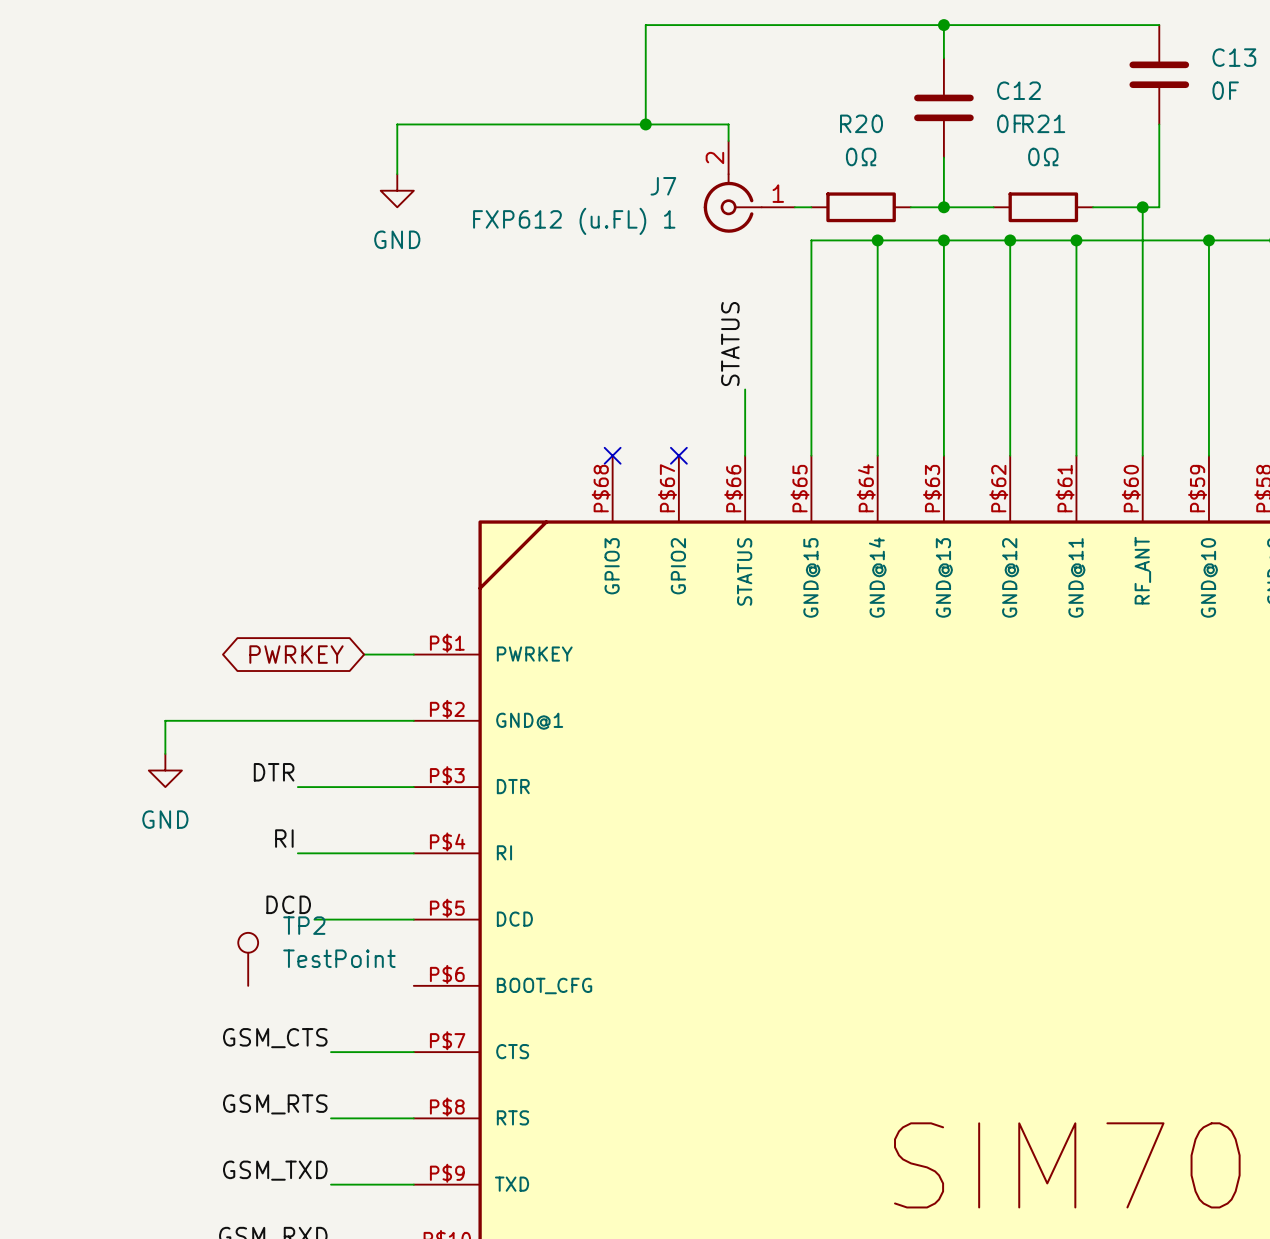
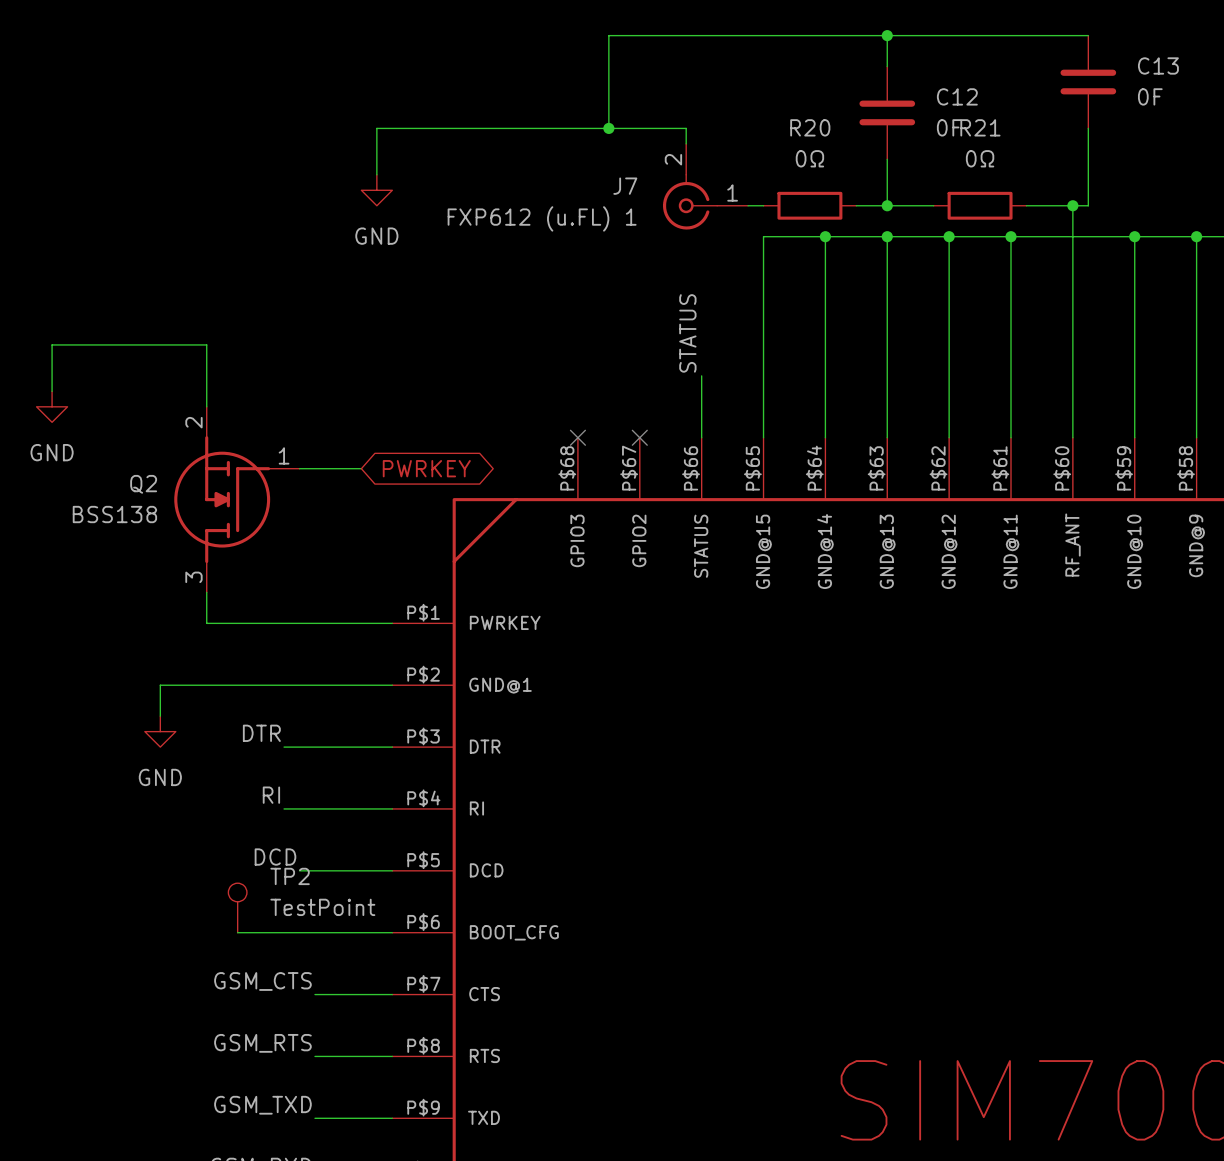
wire: none -> (52, 391) (52, 344) (206, 344) (206, 406)
power symbol: none -> GND (52, 406)
wire: none -> (299, 468) (361, 468)
Q2: none -> BSS138 (236, 499)
wire: none -> (206, 592) (206, 623) (345, 623)
global label rotation: 0° (296, 654) -> 180° (426, 468)
global label position: PWRKEY (296, 654) -> PWRKEY (426, 468)
wire: none -> (237, 932) (392, 932)

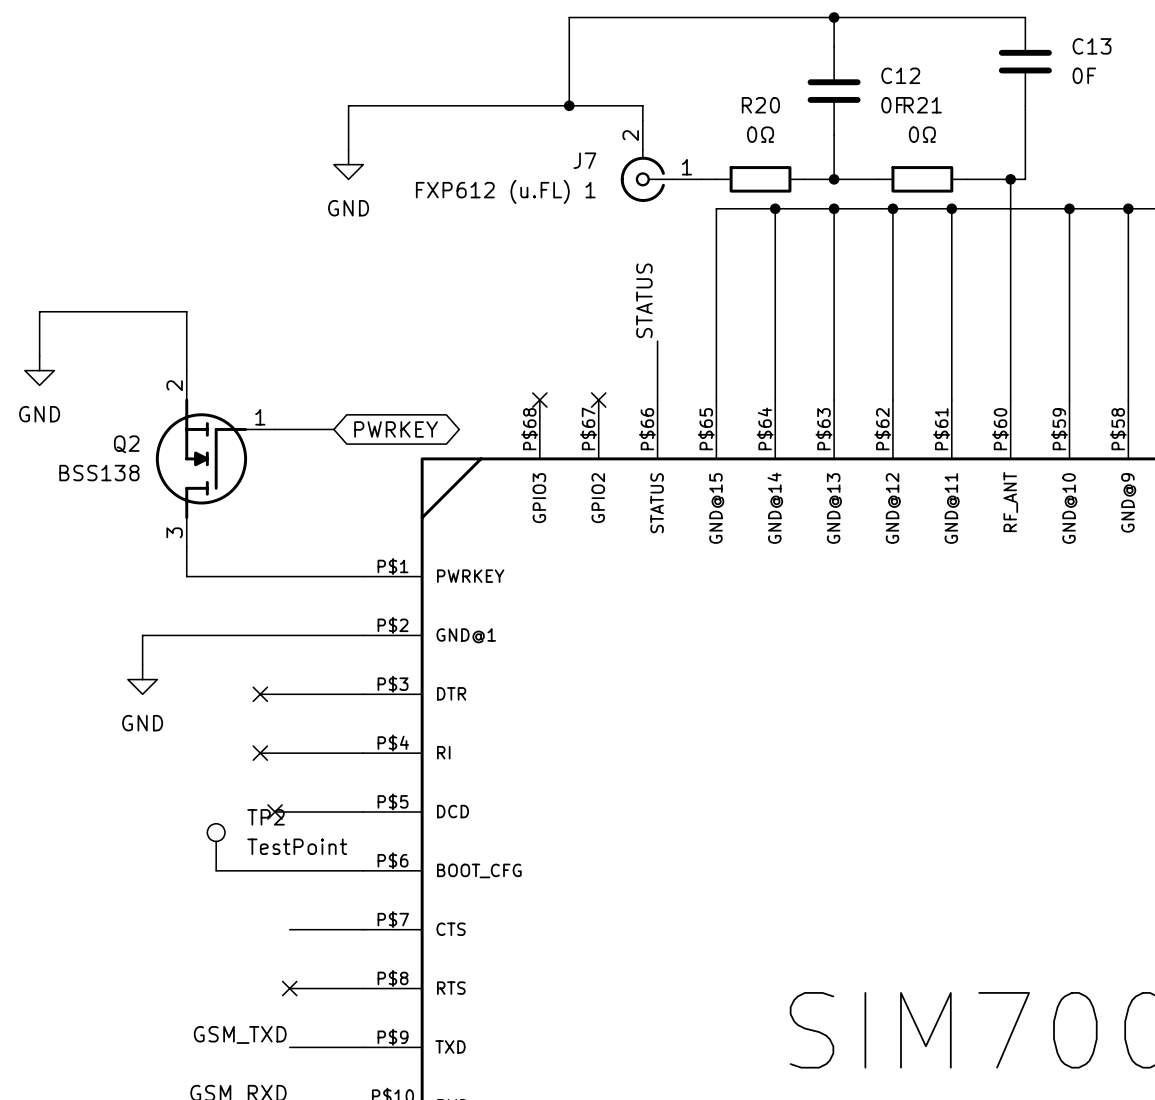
label: DTR (261, 733) -> none
no-connect mark: none -> (260, 694)
label: RI (271, 795) -> none
no-connect mark: none -> (260, 753)
label: DCD (275, 857) -> none
no-connect mark: none -> (275, 811)
label: GSM_CTS (262, 981) -> none
label: GSM_RTS (262, 1043) -> none
no-connect mark: none -> (289, 988)

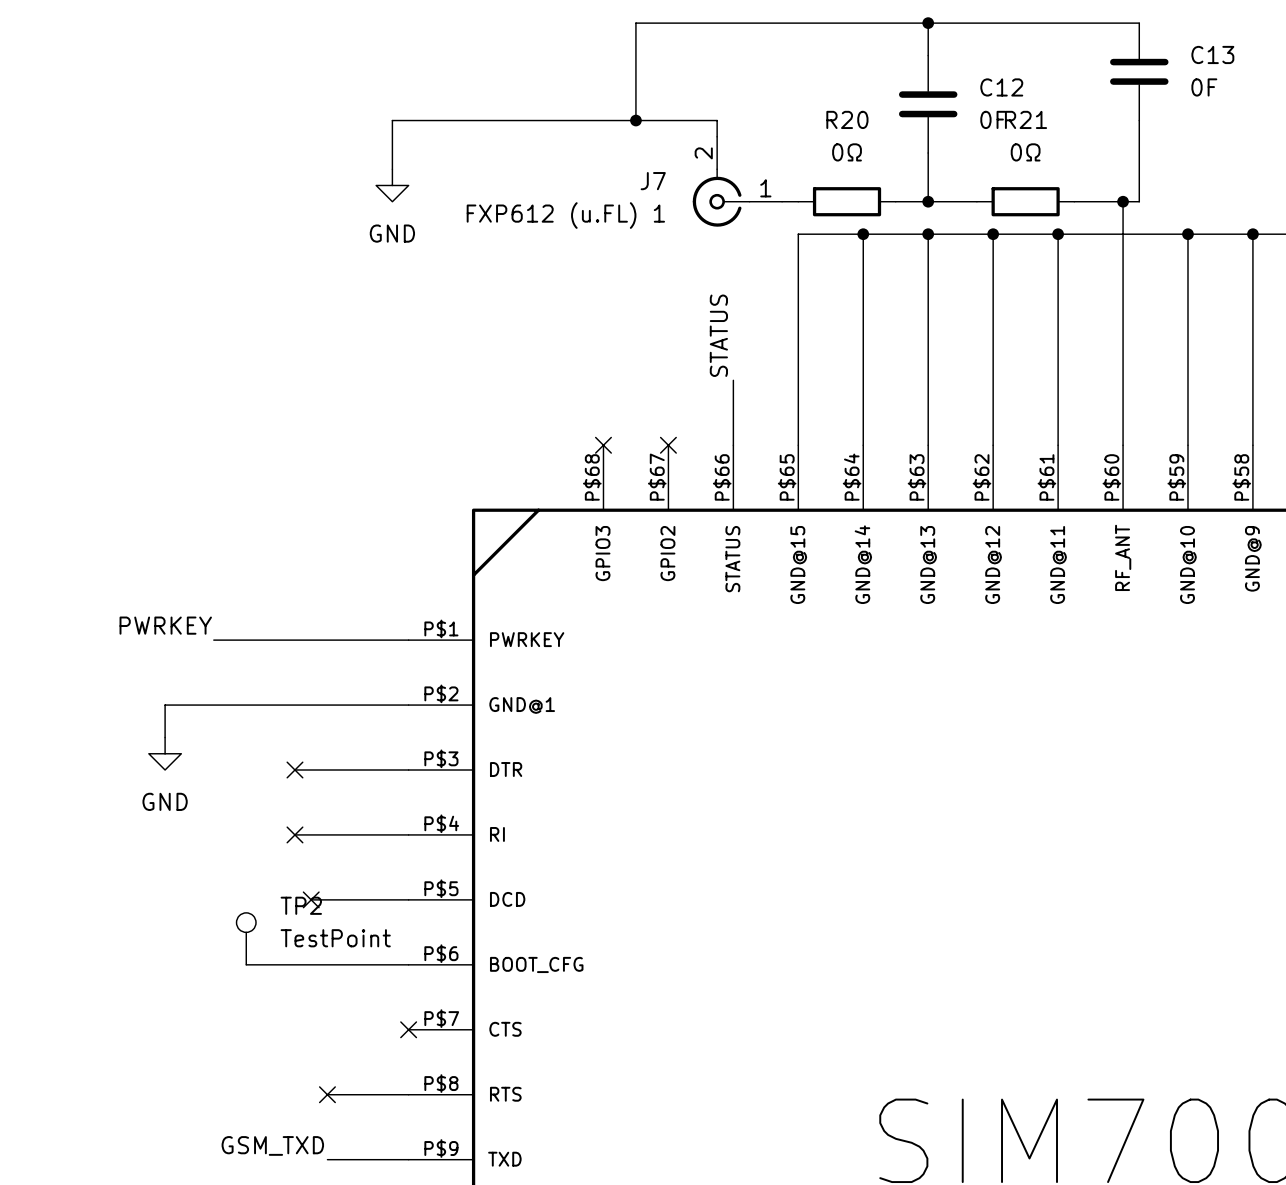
wire: (39, 355) (39, 311) (186, 311) (186, 370) -> none
power symbol: GND (39, 370) -> none
wire: (275, 429) (333, 429) -> none
global label: PWRKEY (396, 429) -> none
Q2: BSS138 (215, 458) -> none
wire: (186, 547) (186, 576) -> none
label: none -> PWRKEY (165, 625)
wire: (289, 929) (363, 929) -> none
no-connect mark: none -> (408, 1029)

